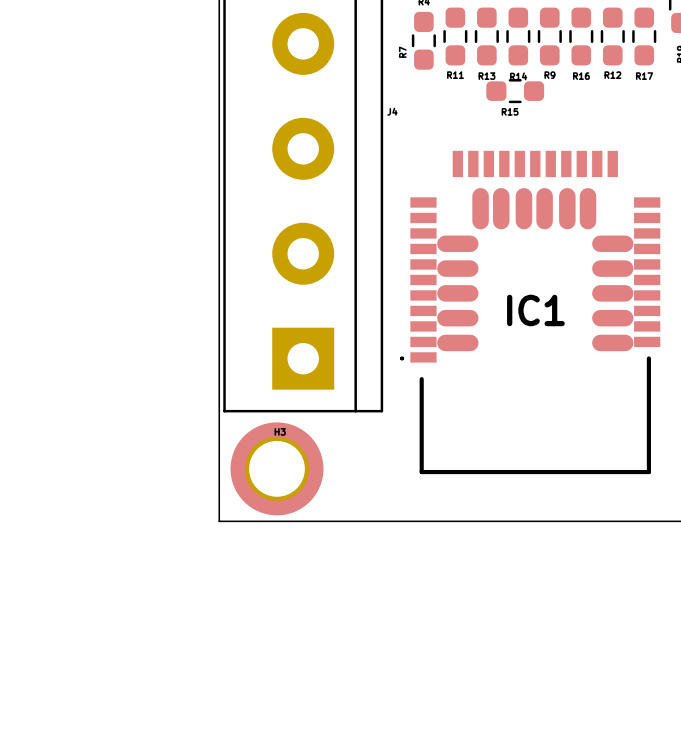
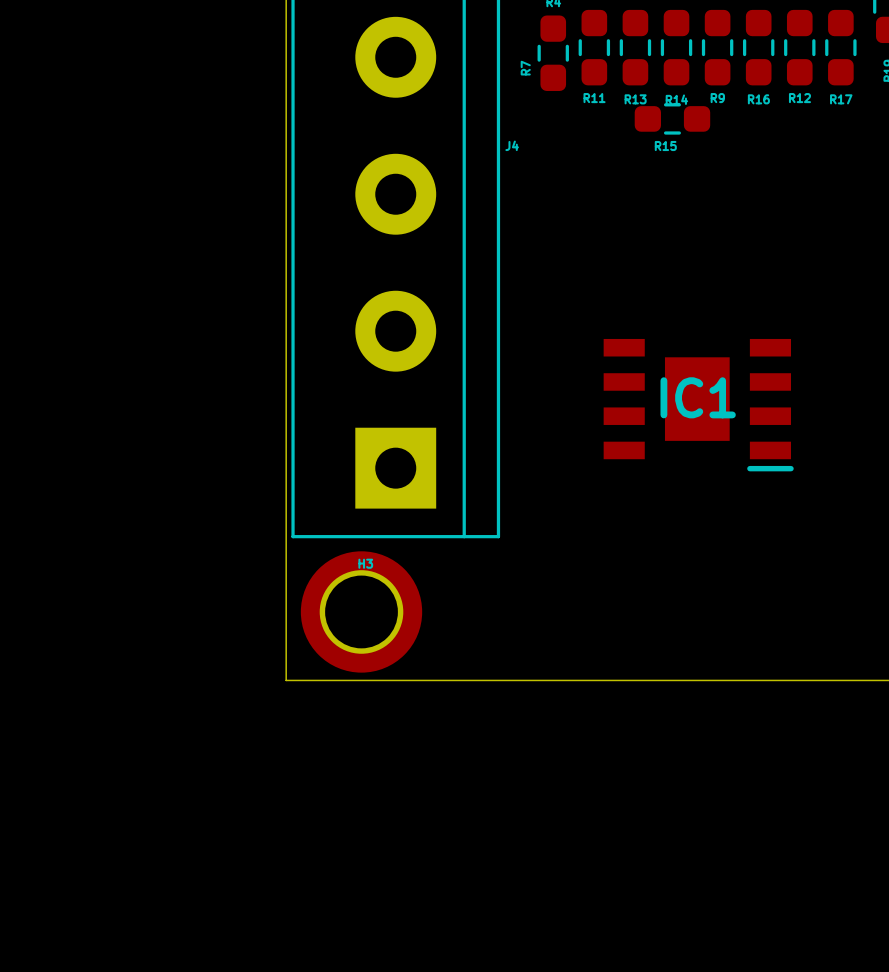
IC1 footprint: [400, 150, 661, 475] -> [603, 338, 794, 472]

